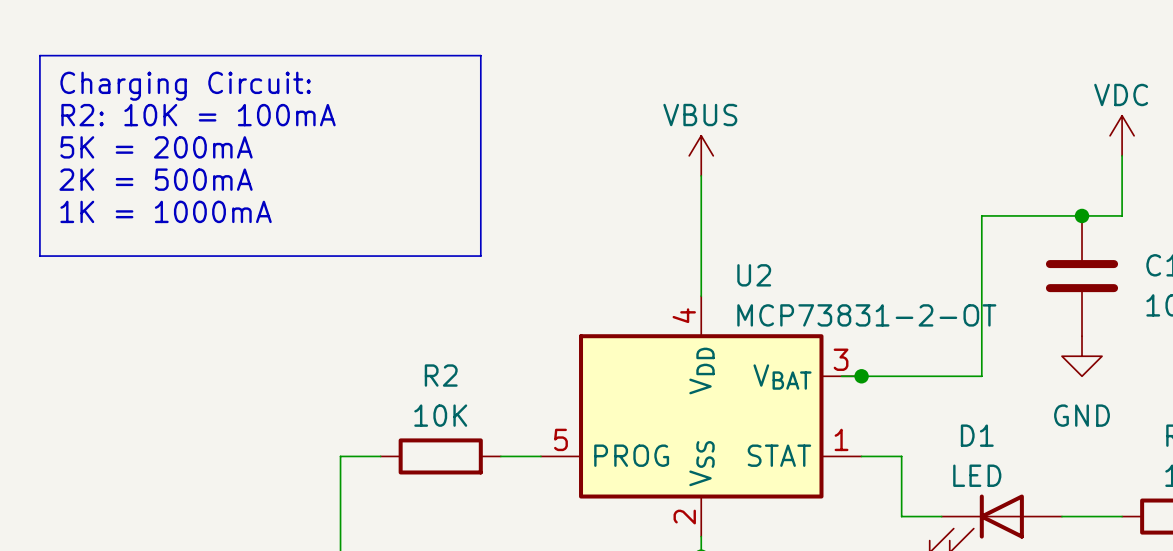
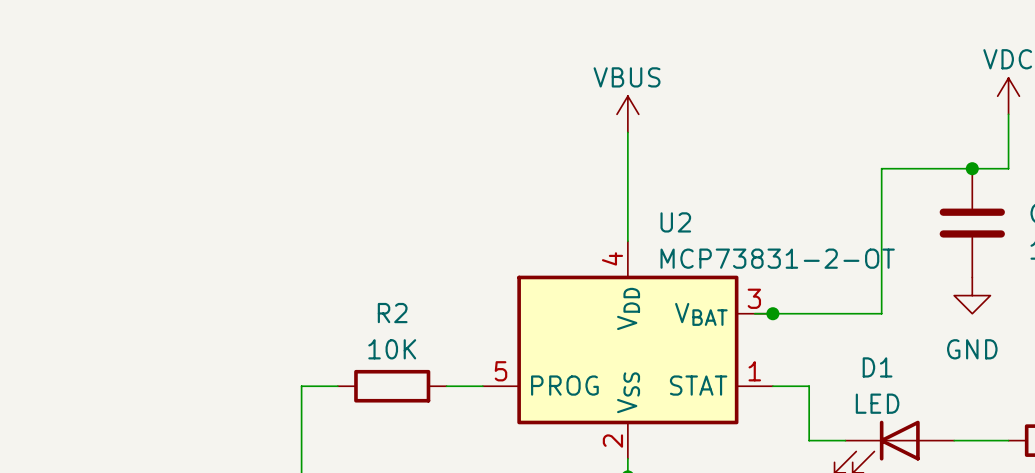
line: (39, 55) (480, 55) (480, 256) (39, 256) (39, 55) -> none
text: Charging Circuit: (185, 86) -> none
text: R2: 10K = 100mA (198, 115) -> none
text: 5K = 200mA (156, 147) -> none
text: 2K = 500mA (156, 179) -> none
text: 1K = 1000mA (166, 211) -> none

